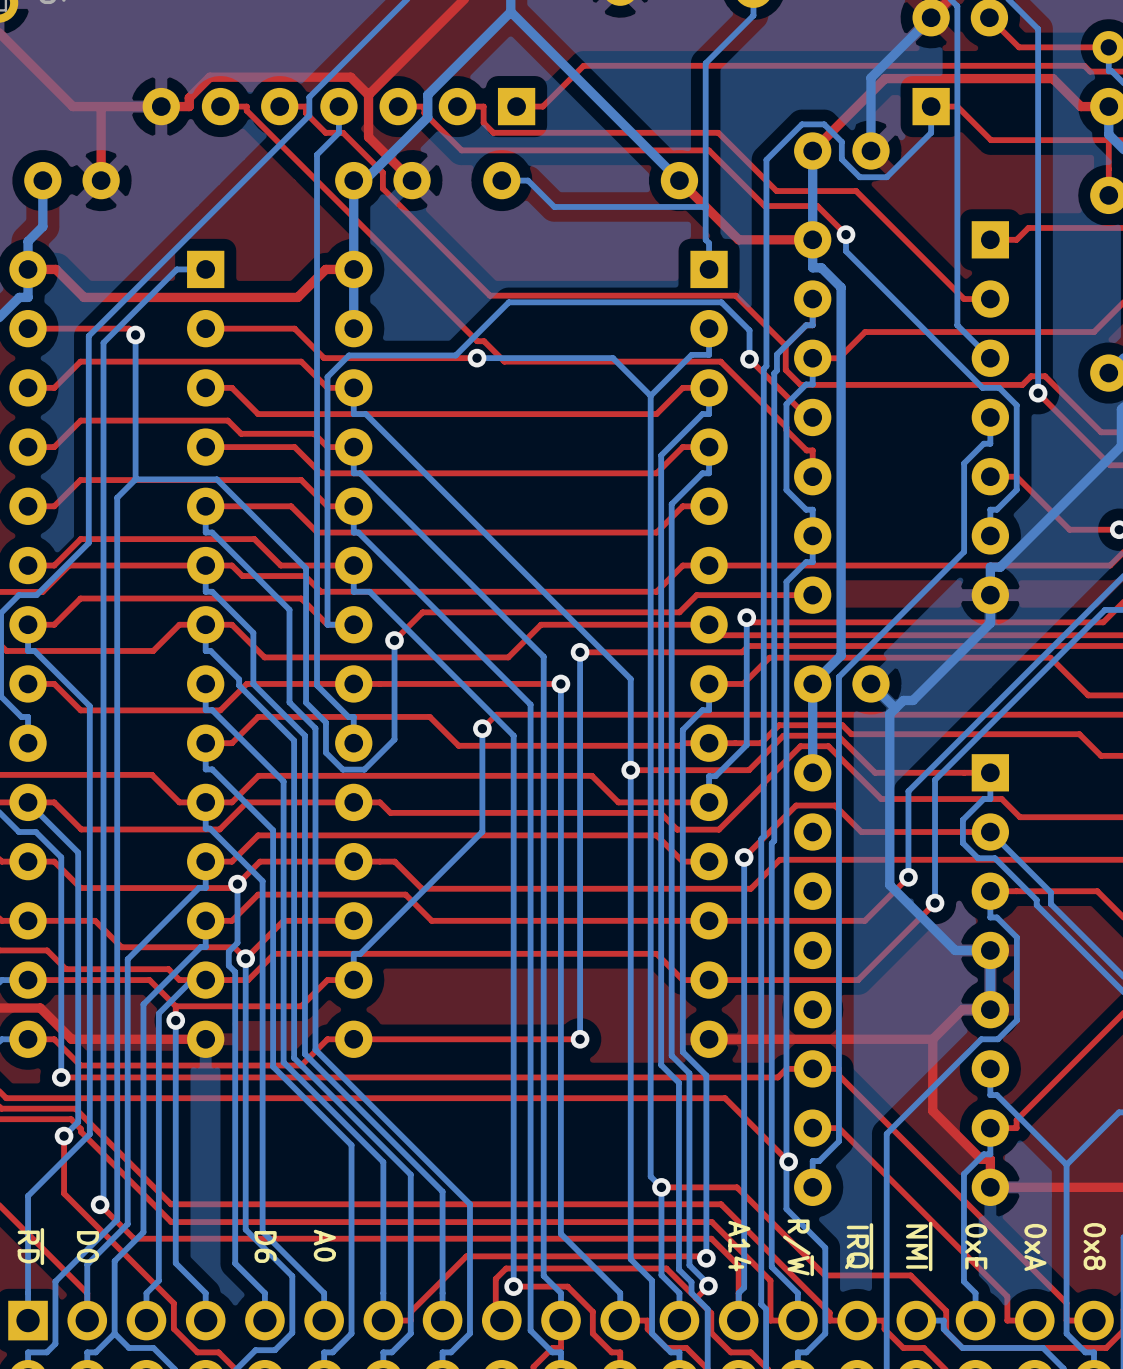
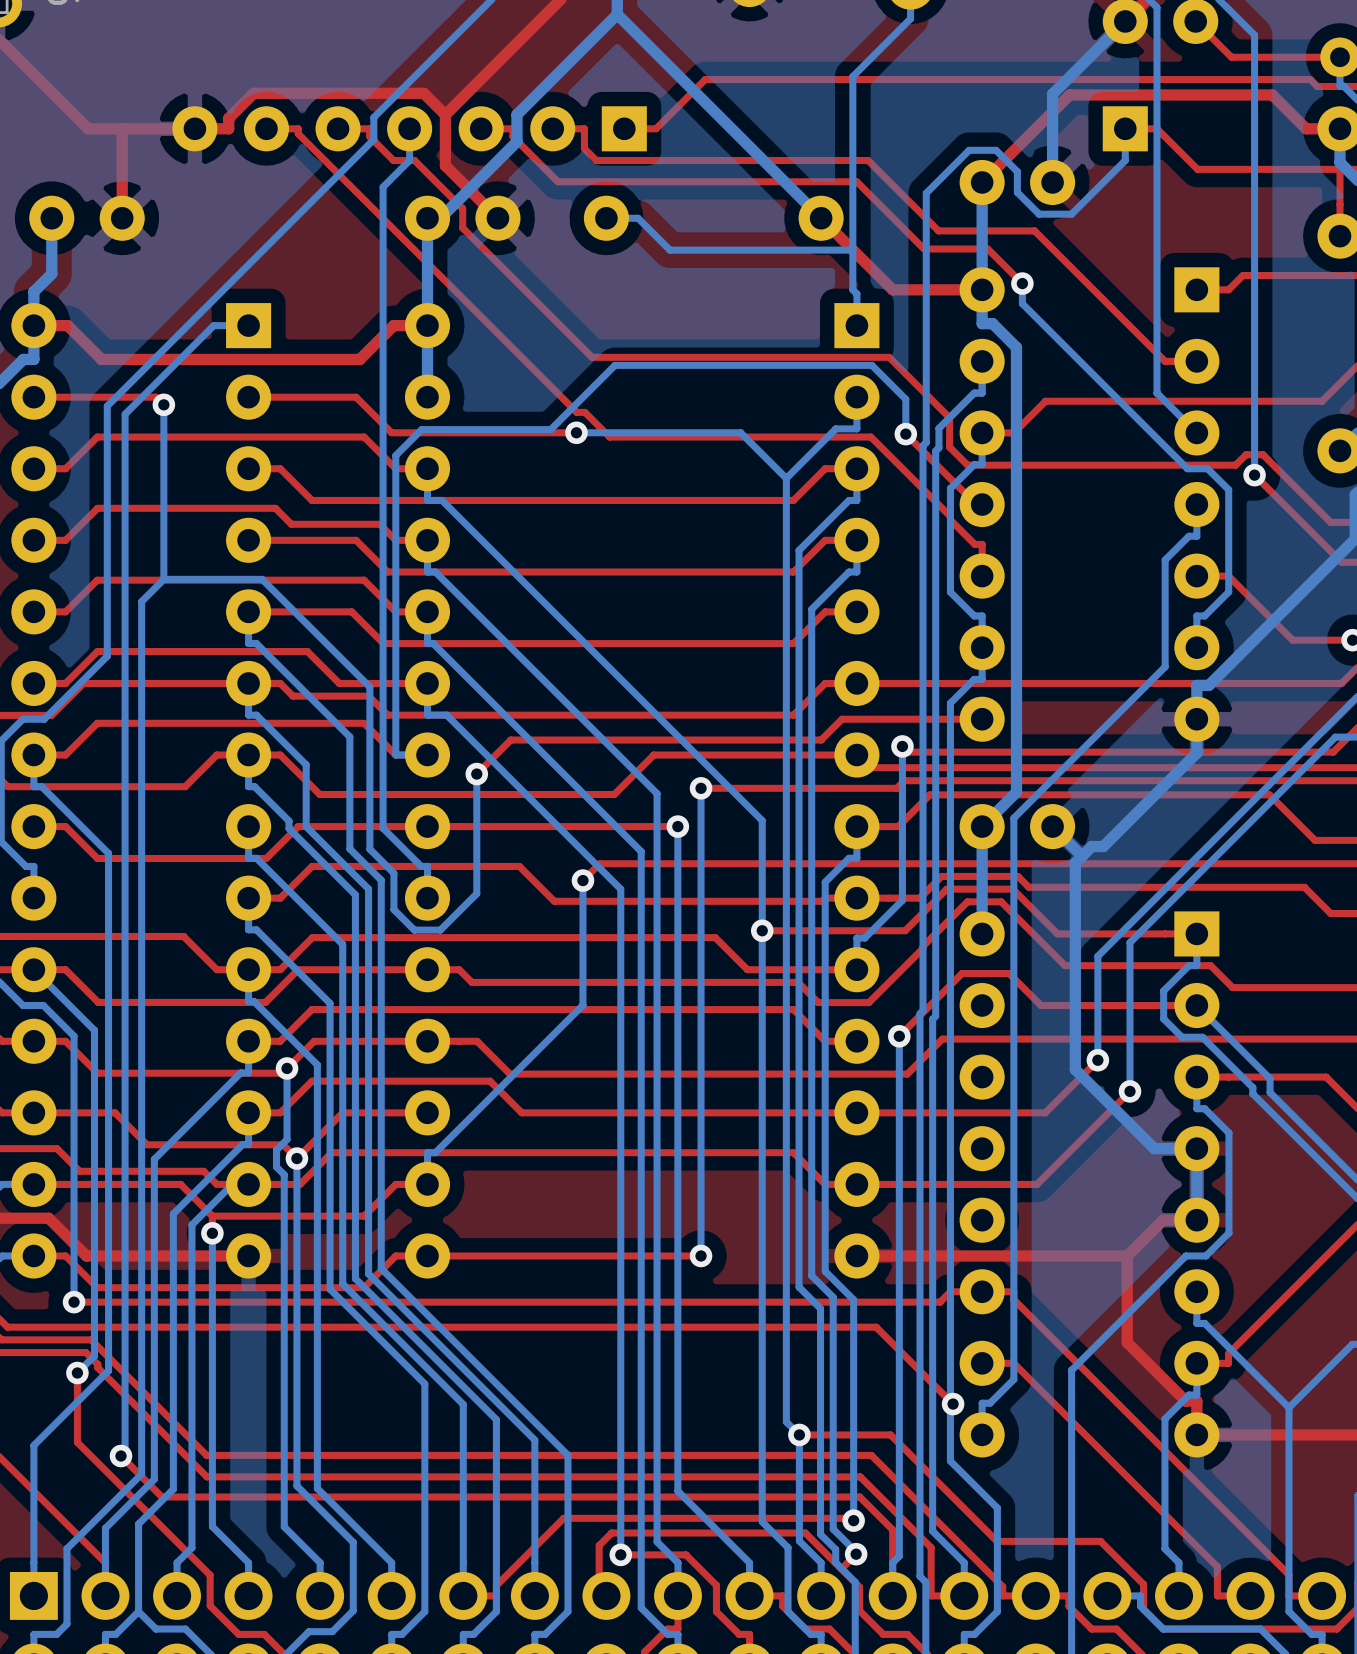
text: A0 (324, 1245) -> none
text: ~{RD} (30, 1246) -> none
text: D0 (87, 1246) -> none
text: D6 (265, 1246) -> none
text: A14 (739, 1246) -> none
text: ~{IRQ} (859, 1246) -> none
text: ~{NMI} (919, 1246) -> none
text: 0xE (976, 1246) -> none
text: 0x8 (1094, 1246) -> none
text: R/~{W} (798, 1247) -> none
text: 0xA (1035, 1247) -> none

